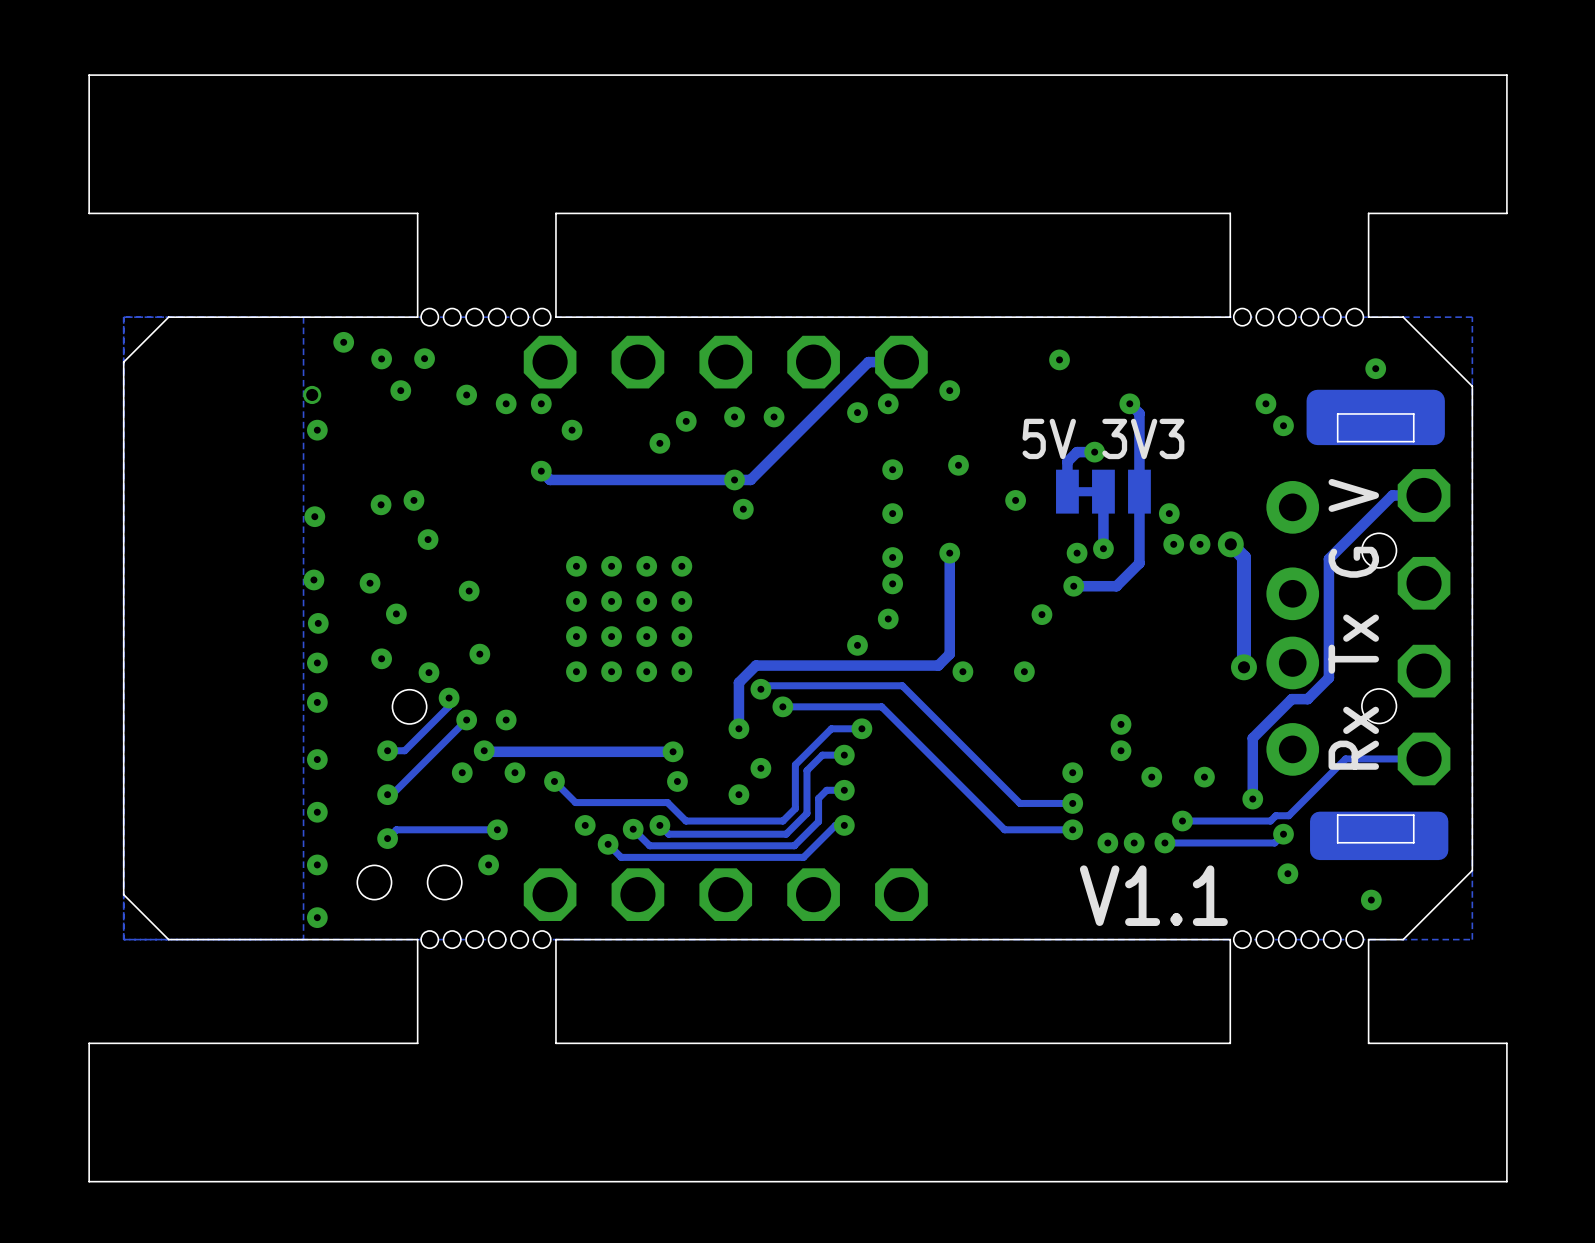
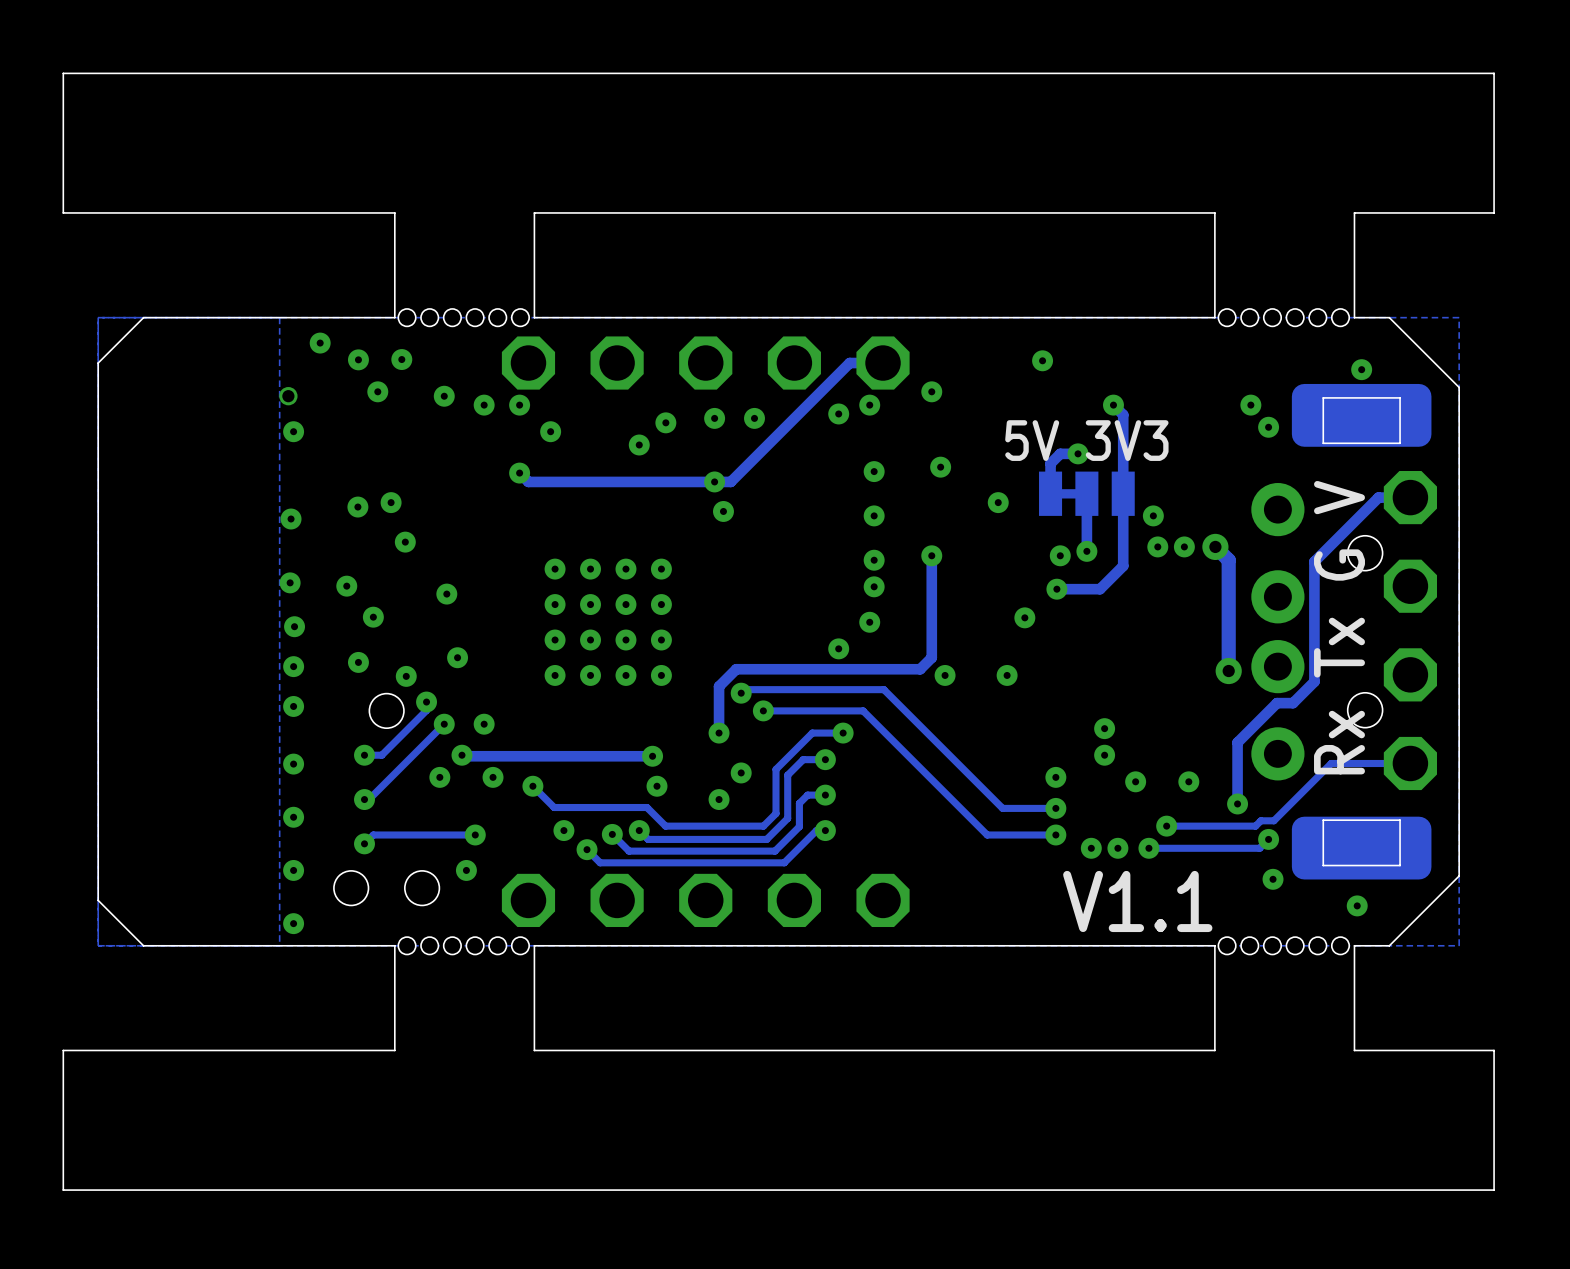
part footprint: [1266, 389, 1449, 861] -> [1251, 383, 1432, 880]

